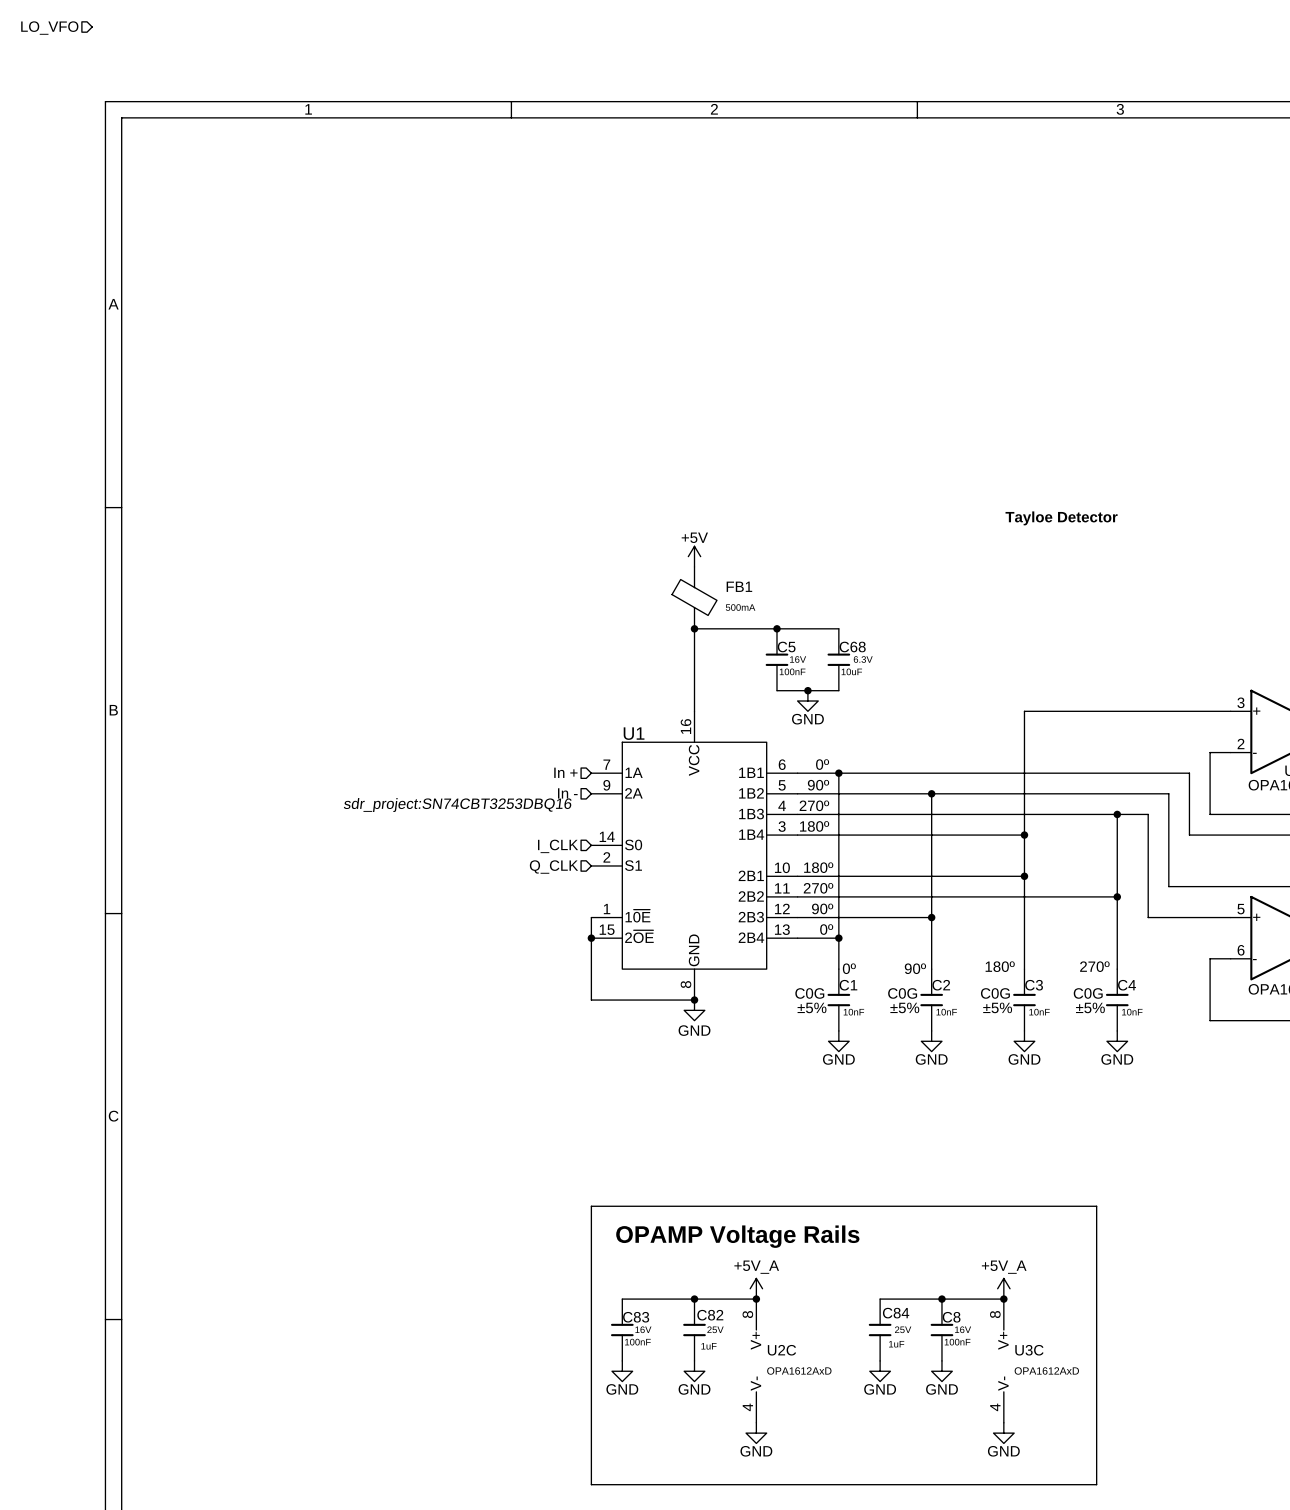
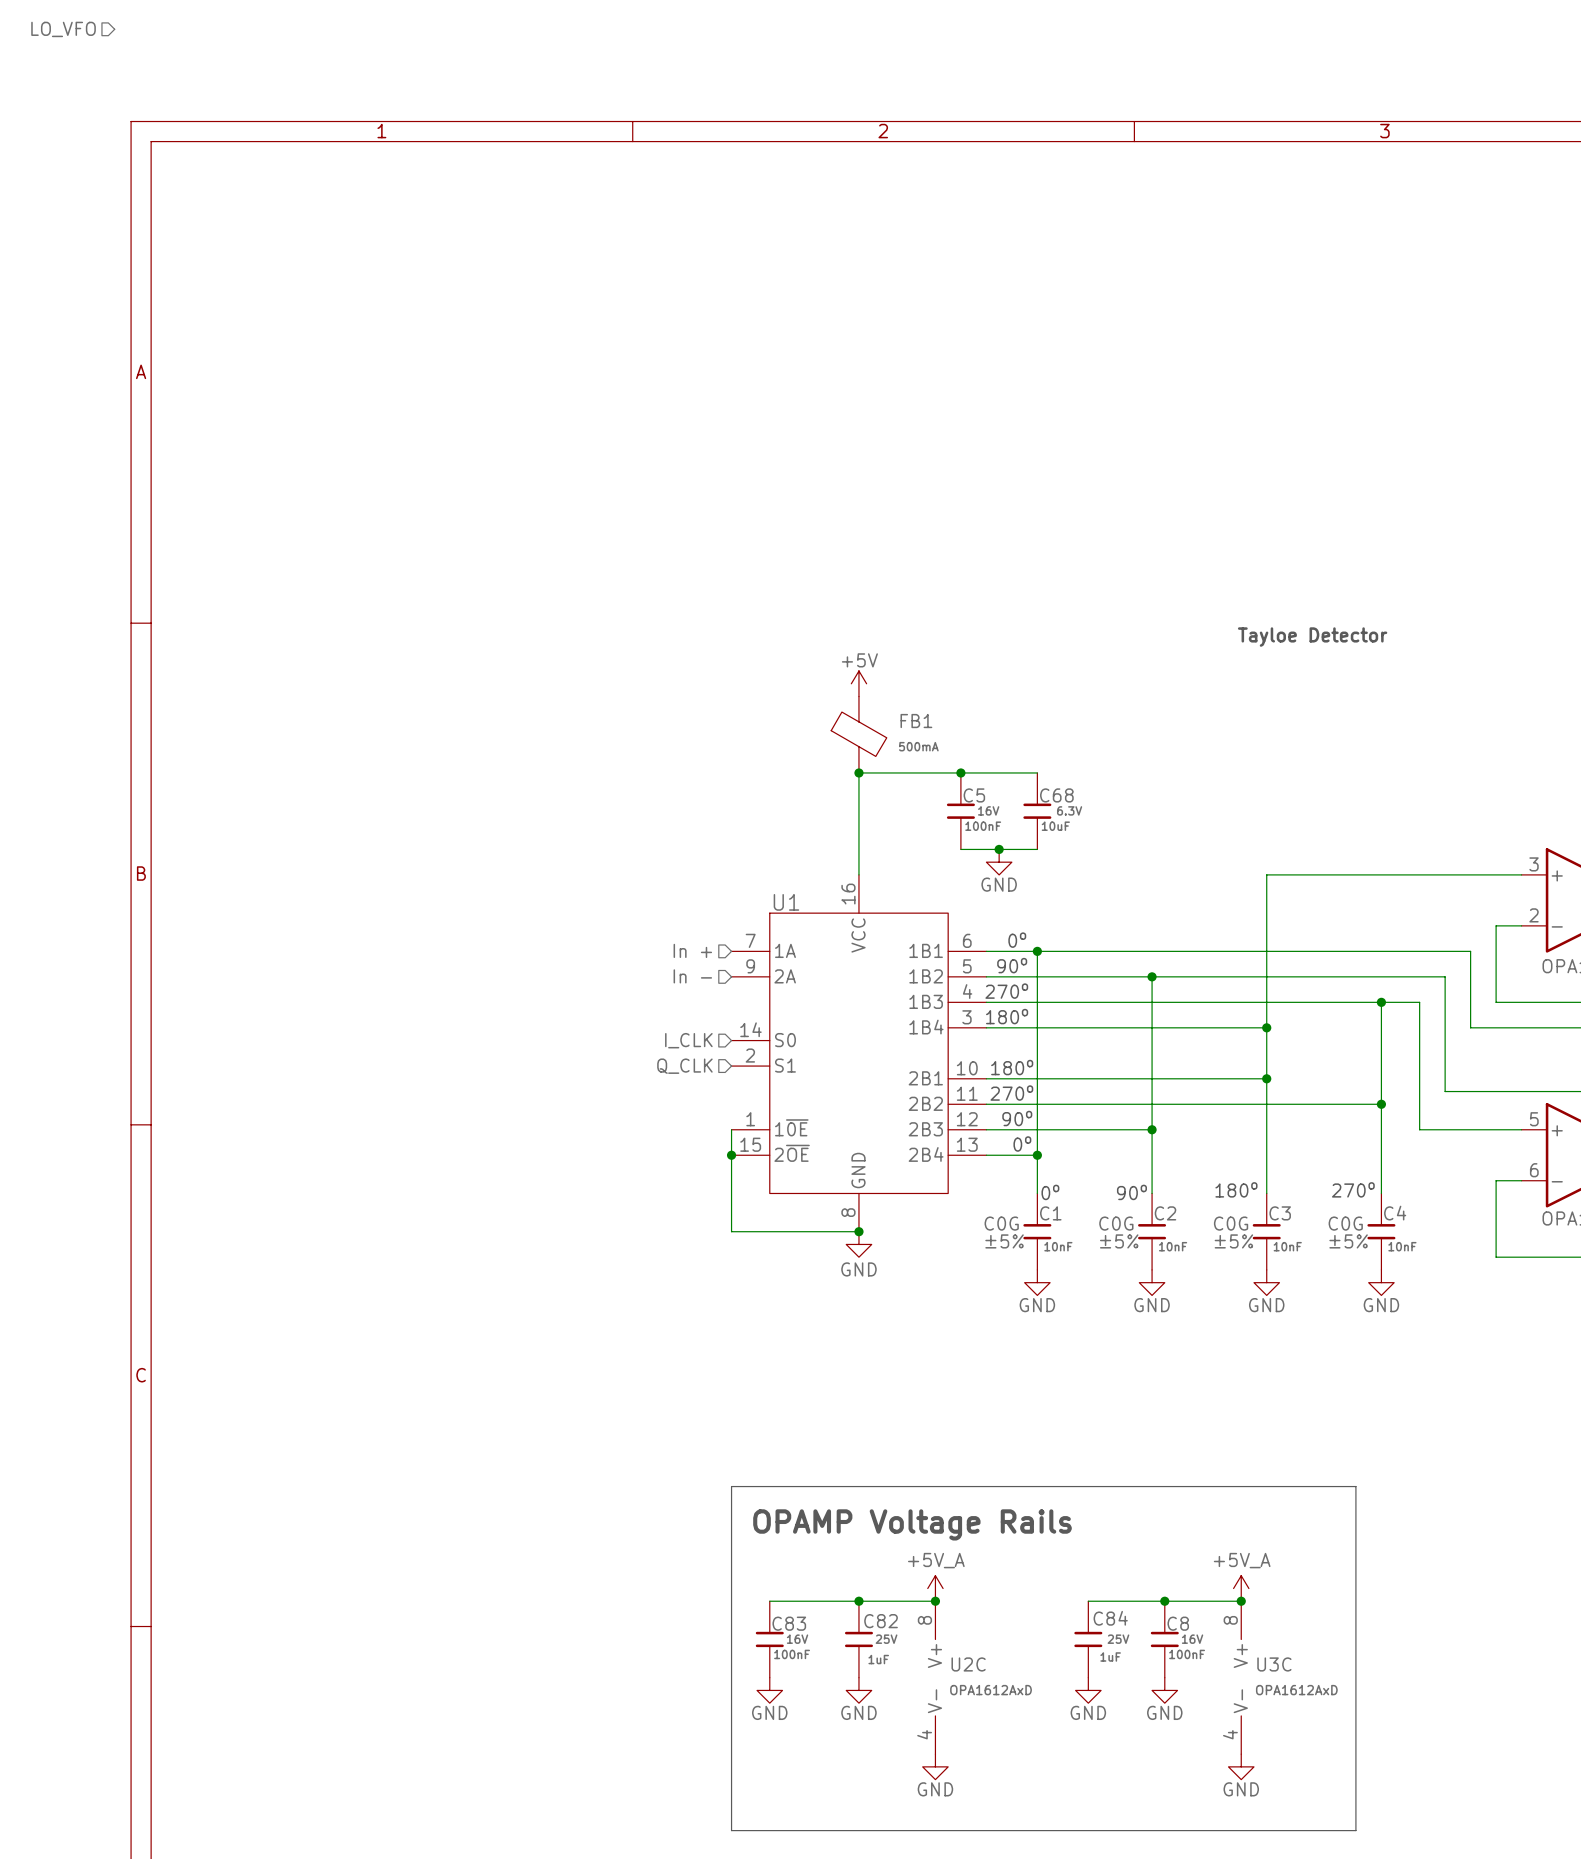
U1 text: sdr_project:SN74CBT3253DBQ16 (457, 805) -> none

